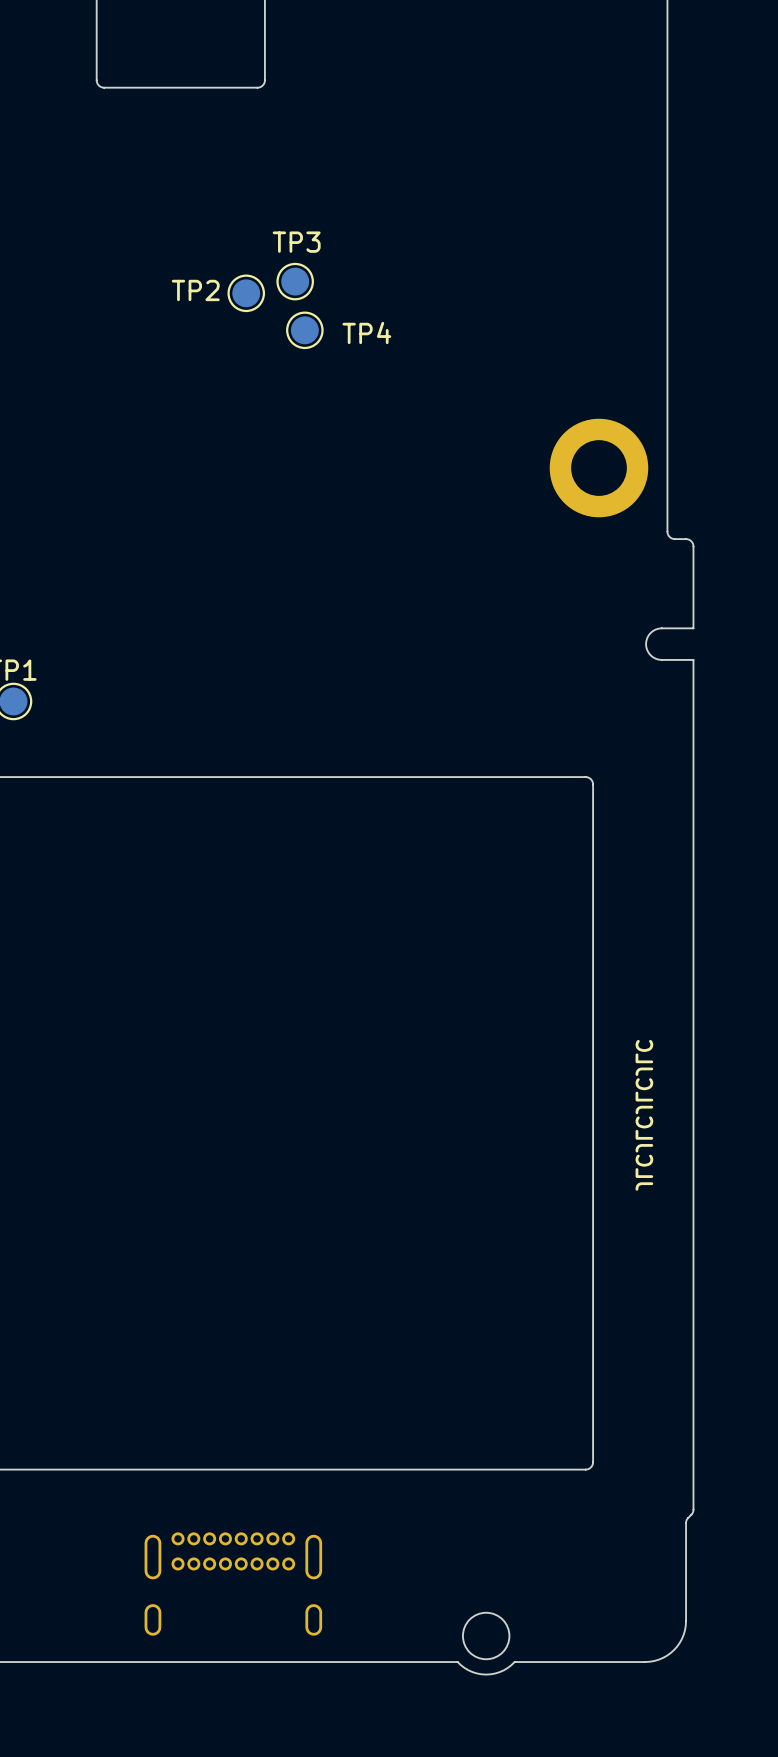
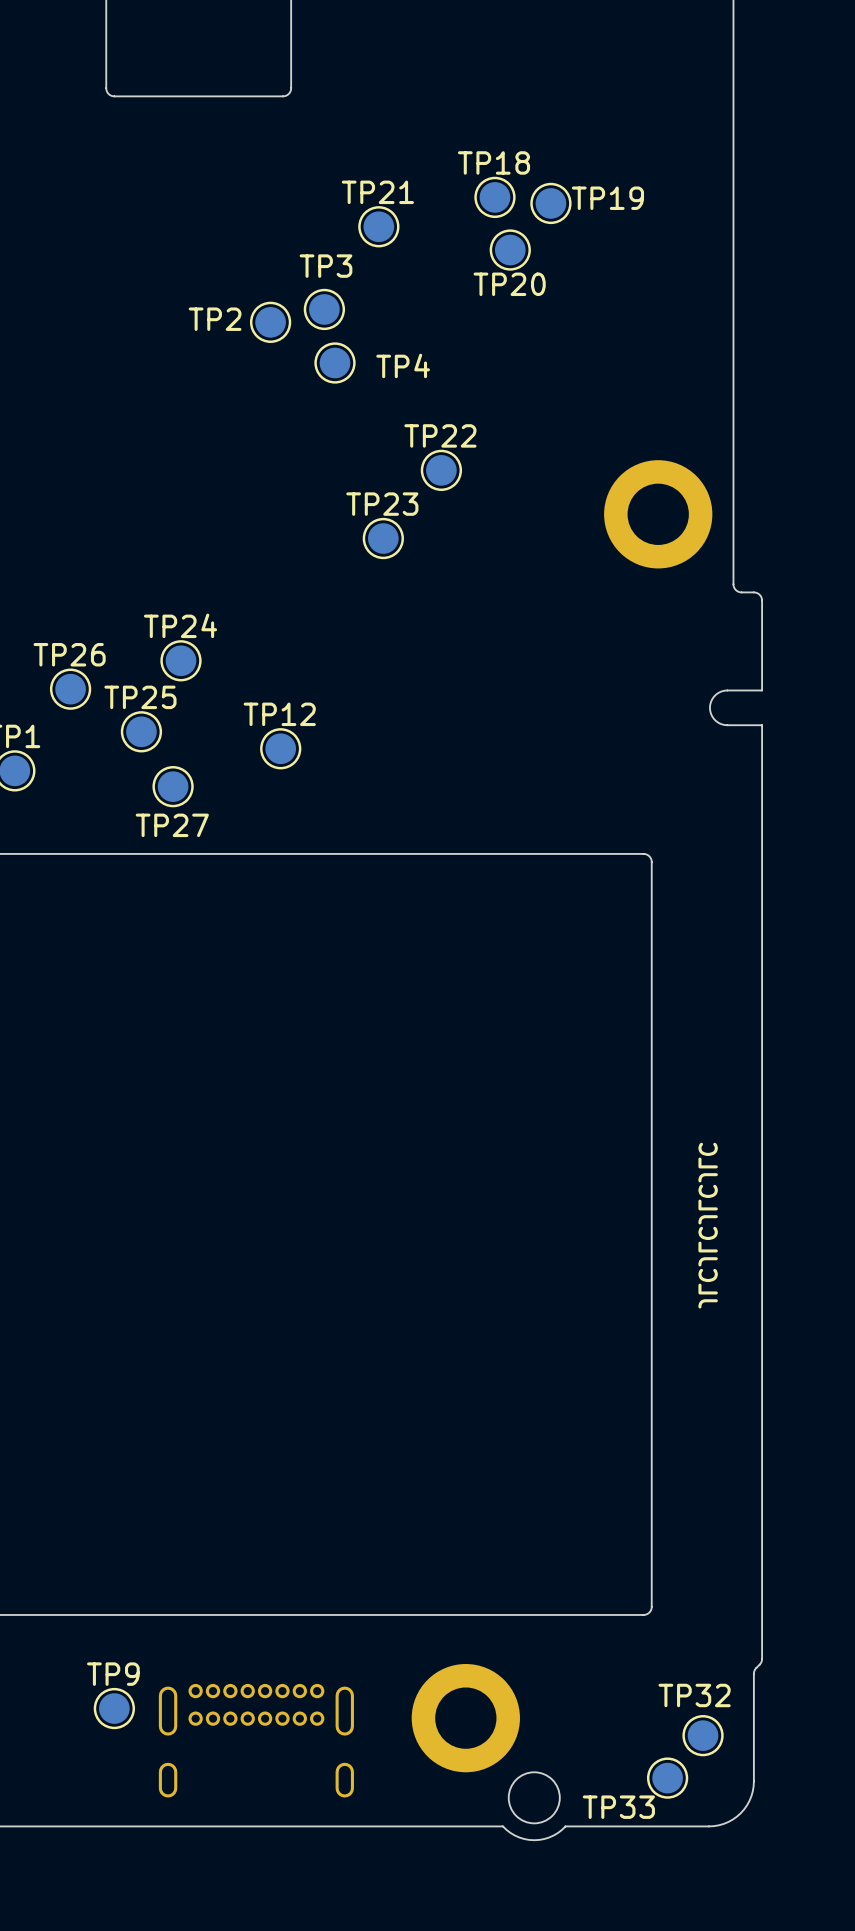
TP18: none -> (494, 197)
TP19: none -> (550, 203)
TP21: none -> (378, 226)
TP20: none -> (510, 250)
TP22: none -> (441, 470)
TP23: none -> (383, 538)
TP24: none -> (180, 660)
TP26: none -> (70, 689)
TP25: none -> (141, 731)
TP12: none -> (280, 748)
TP27: none -> (173, 786)
TP9: none -> (114, 1708)
part: none -> (465, 1718)
TP32: none -> (703, 1735)
TP33: none -> (667, 1778)

